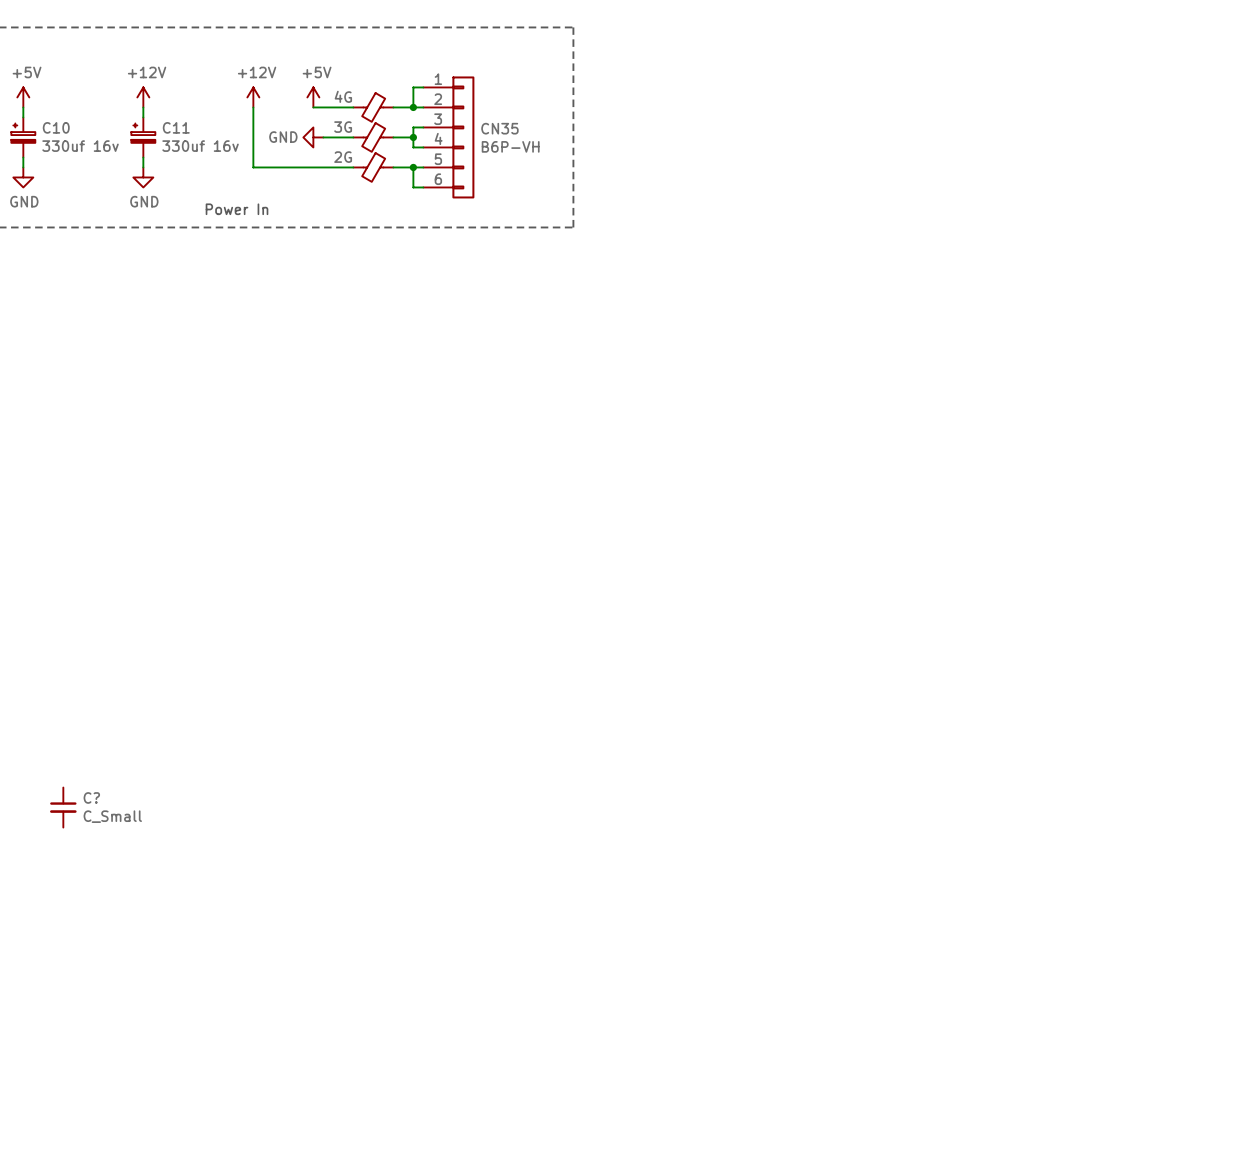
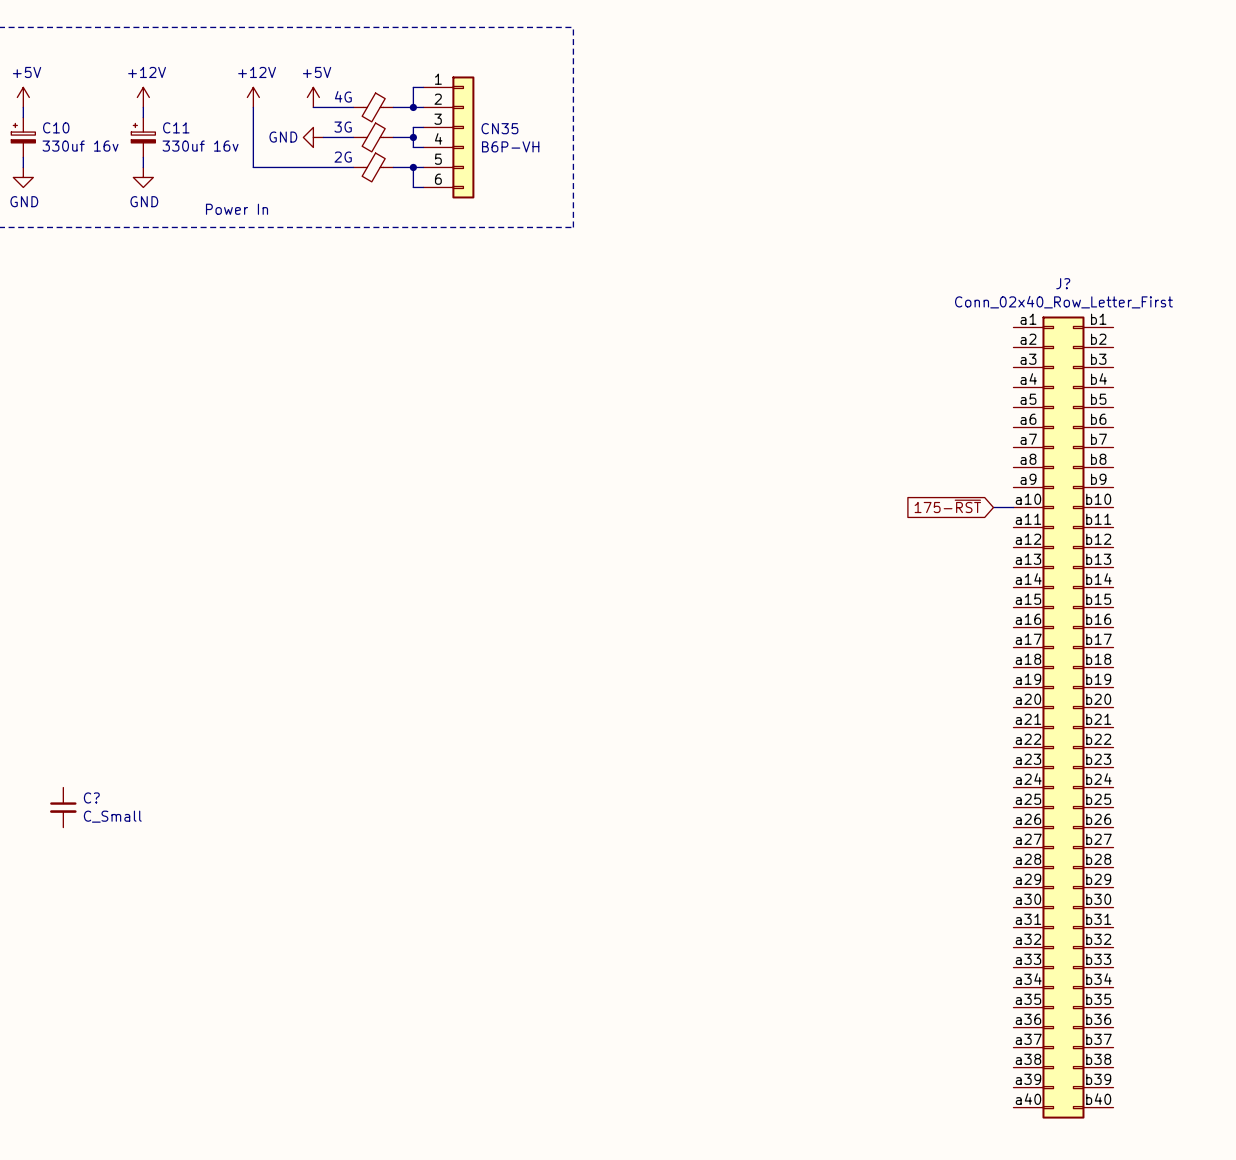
global label: none -> 175-~{RST} (947, 506)
wire: none -> (993, 507) (1013, 507)
J?: none -> Conn_02x40_Row_Letter_First (1063, 717)

